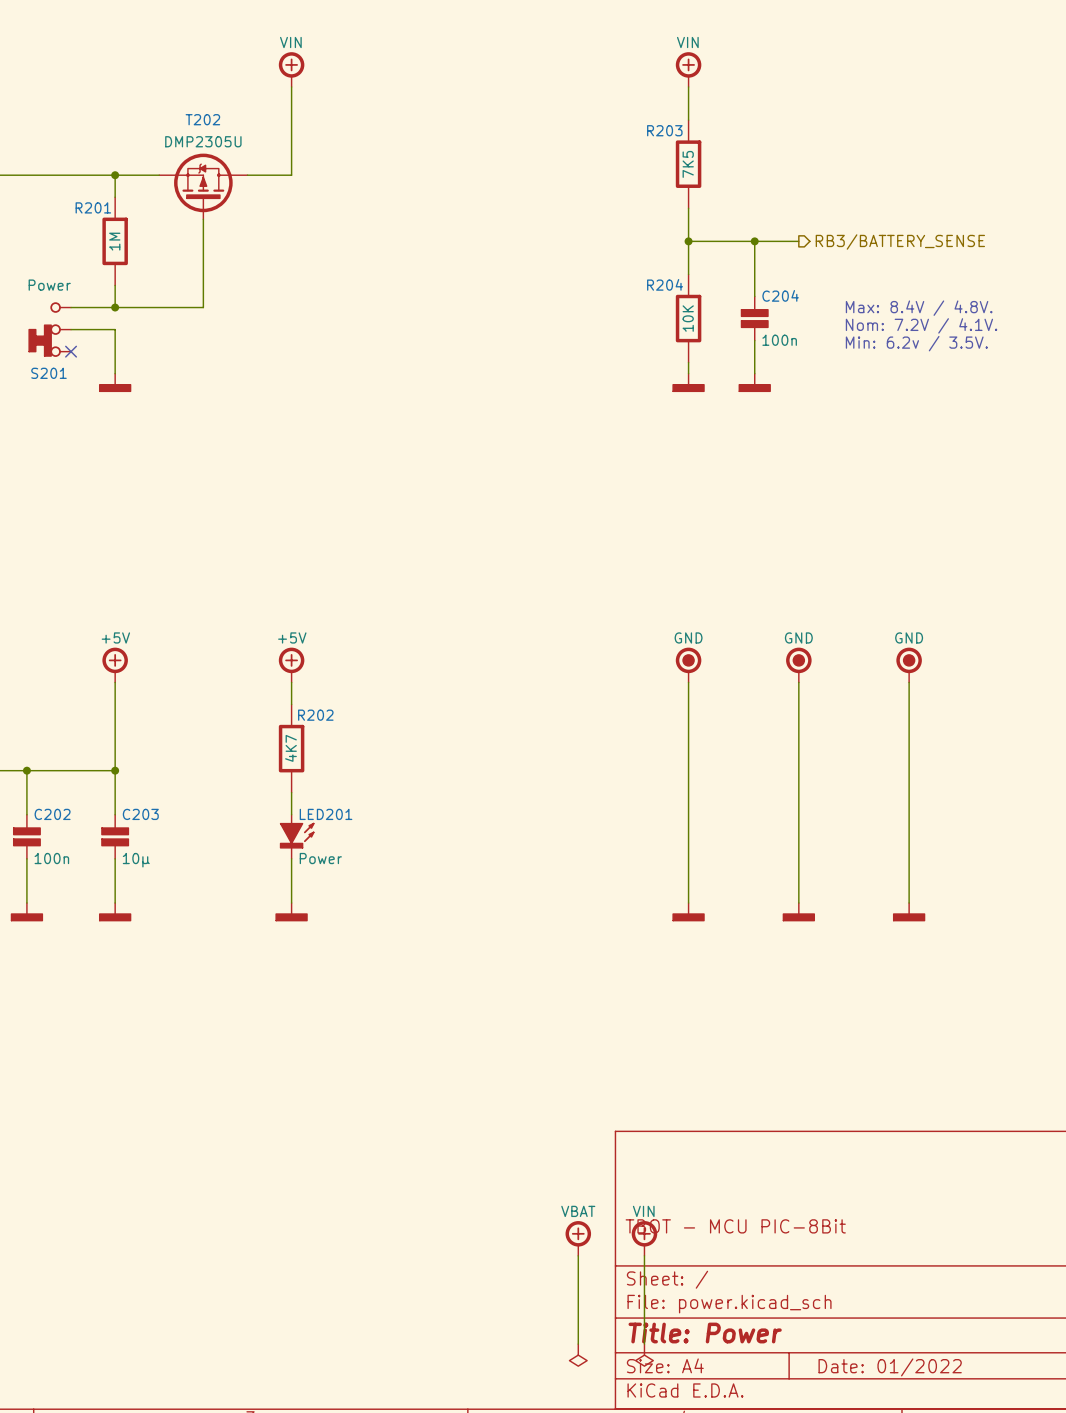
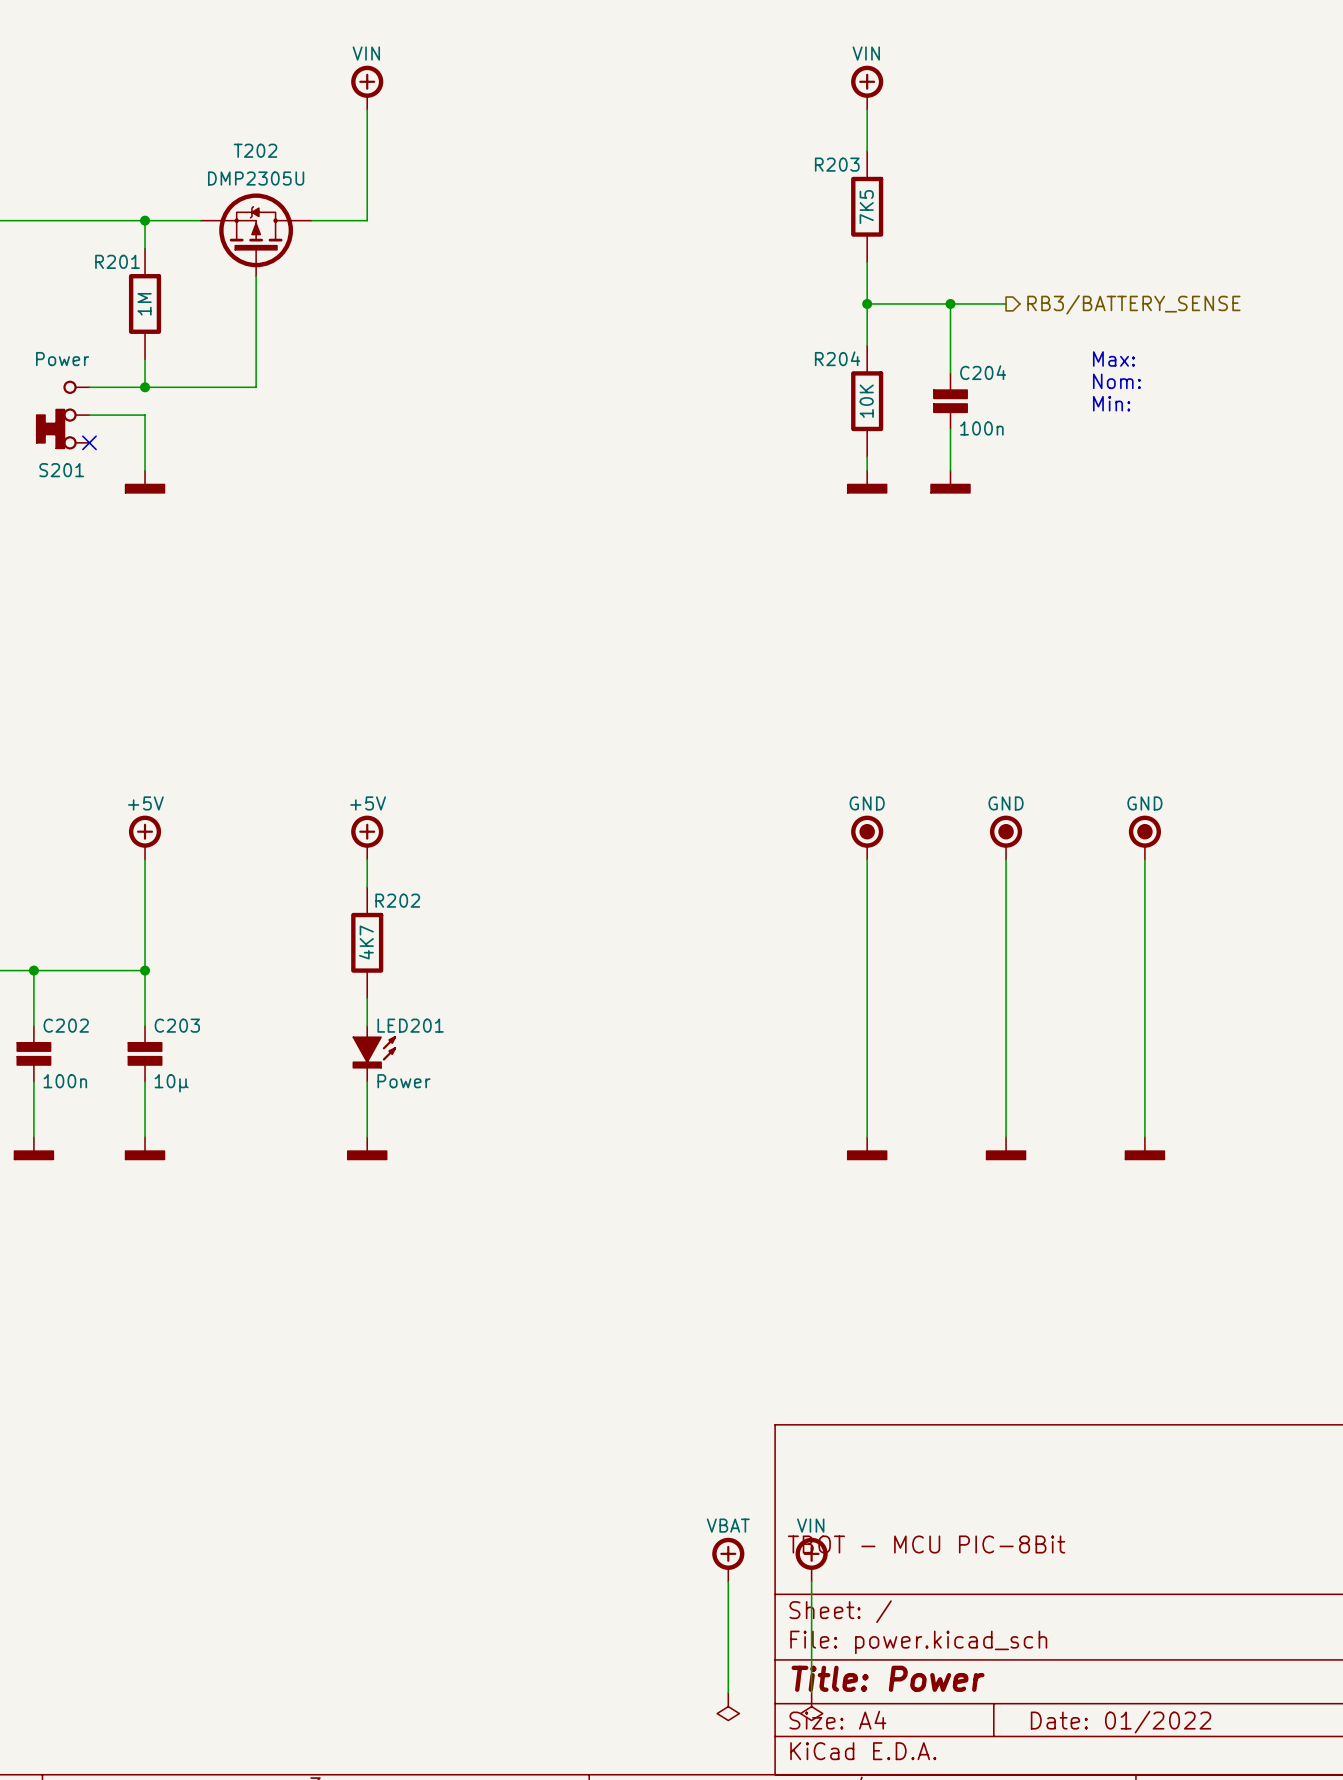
text: none -> Max: (1113, 358)
text: none -> Nom: (1116, 381)
text: Max: 8.4V / 4.8V. (919, 308) -> none
text: none -> Min: (1111, 403)
text: Nom: 7.2V / 4.1V. (921, 325) -> none
text: Min: 6.2v / 3.5V. (916, 343) -> none

